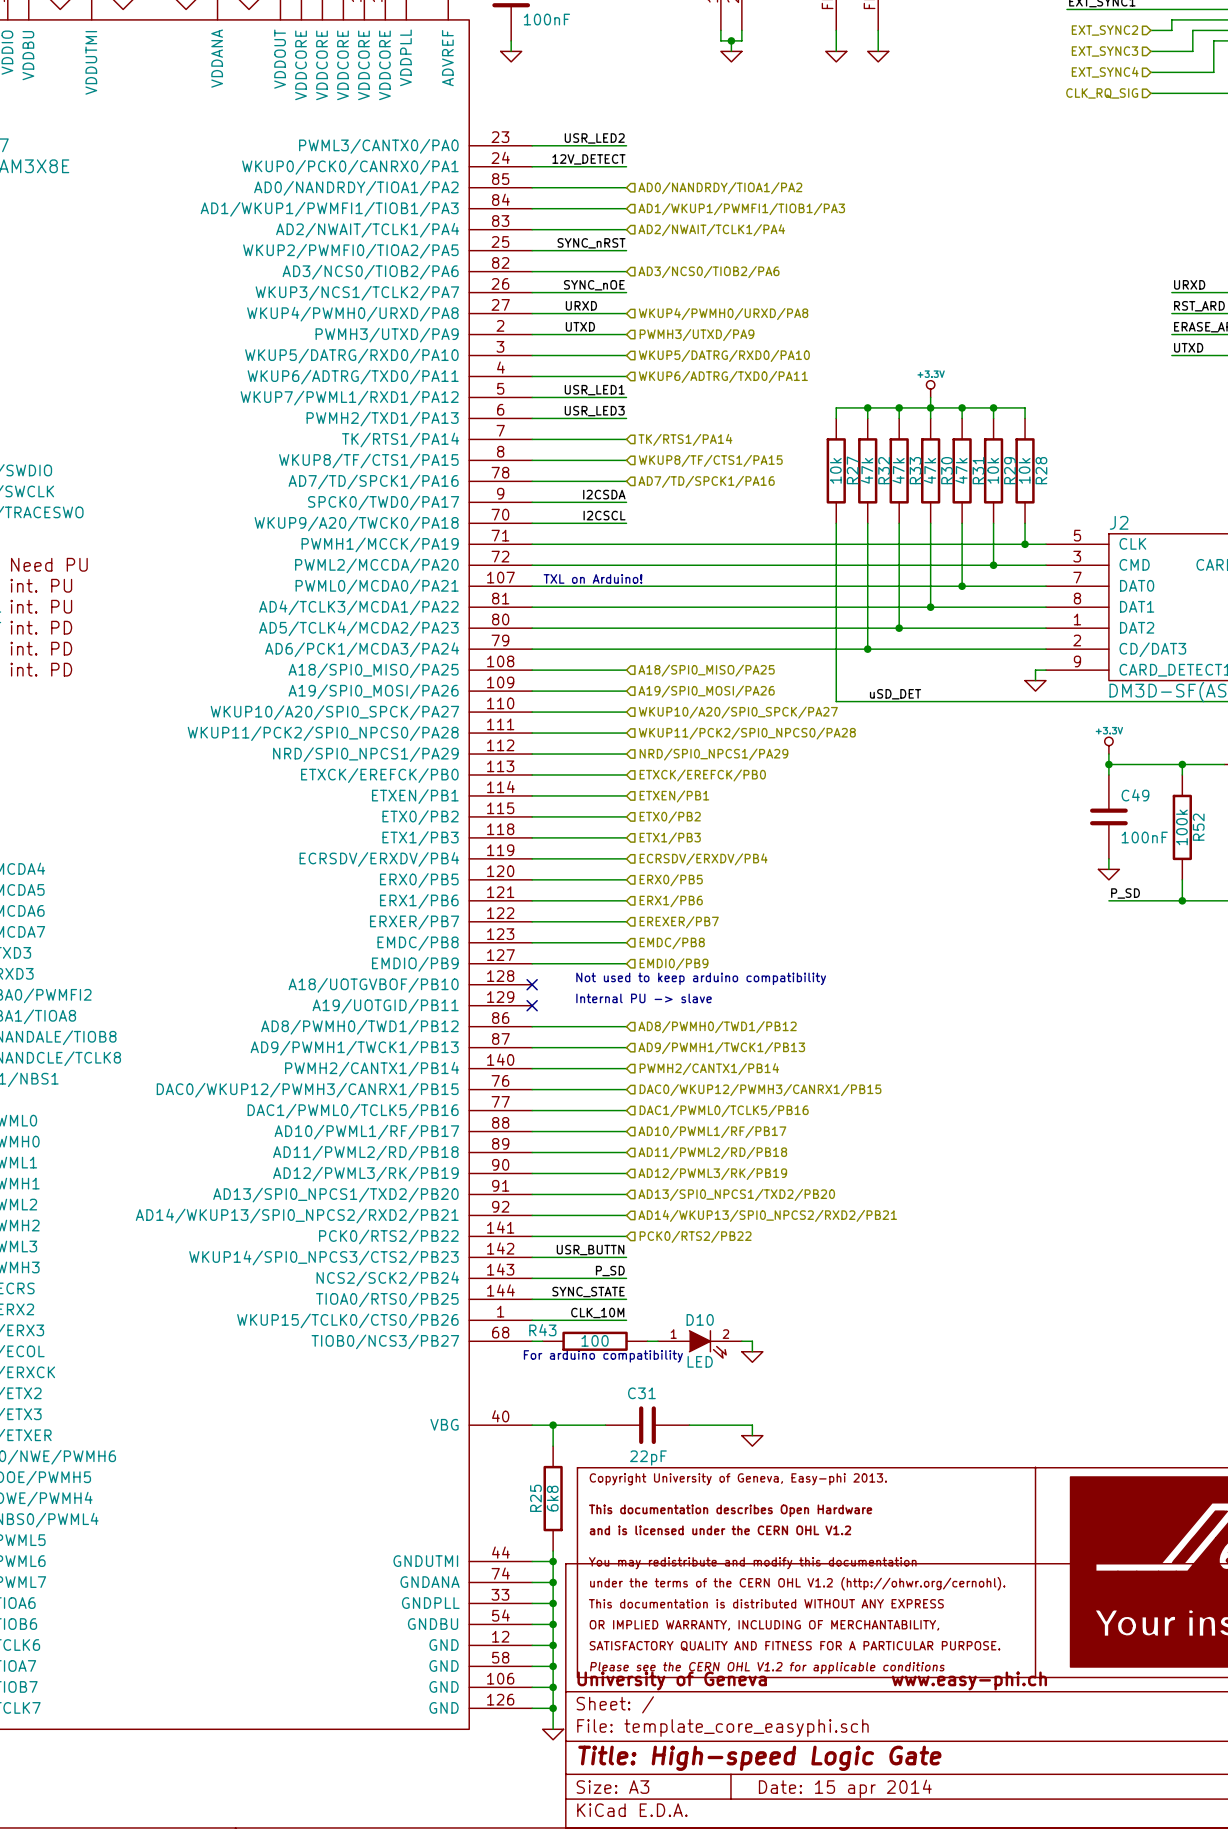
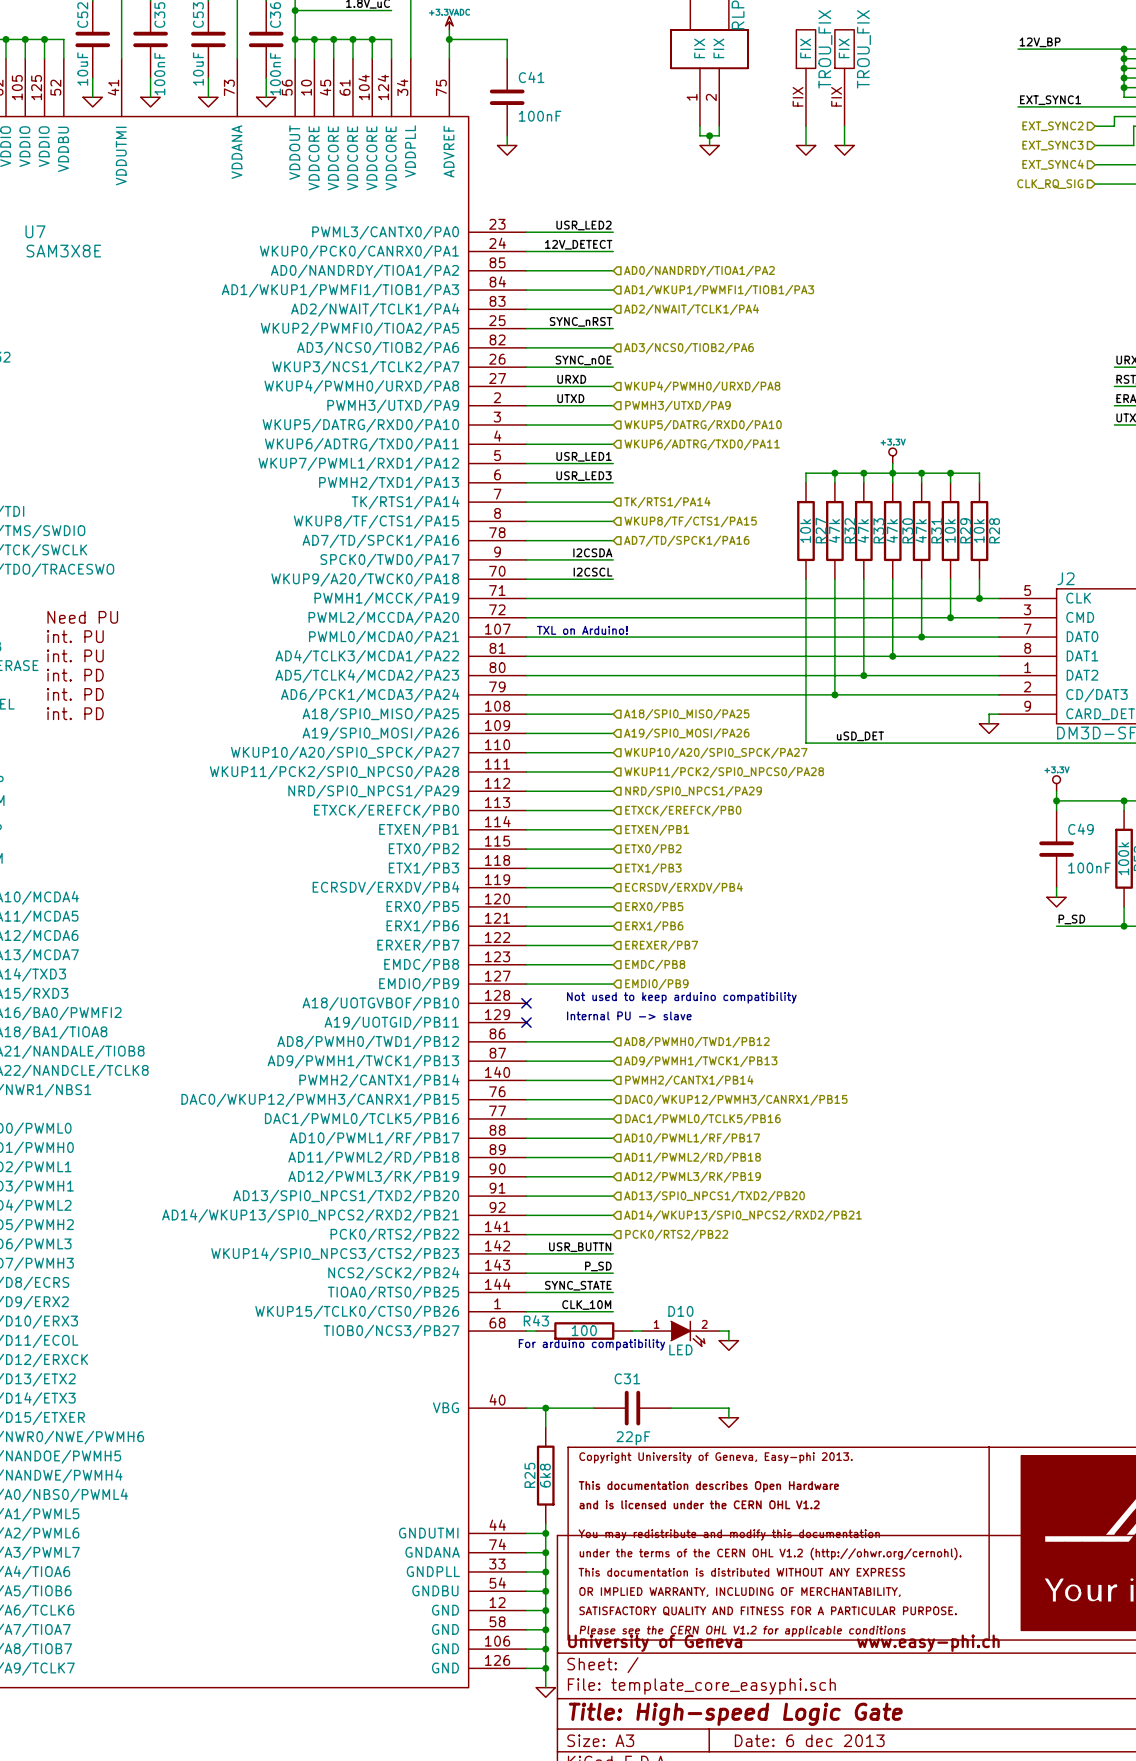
title block: Date: 15 apr 2014 (845, 1788) -> Date: 6 dec 2013 (809, 1740)

